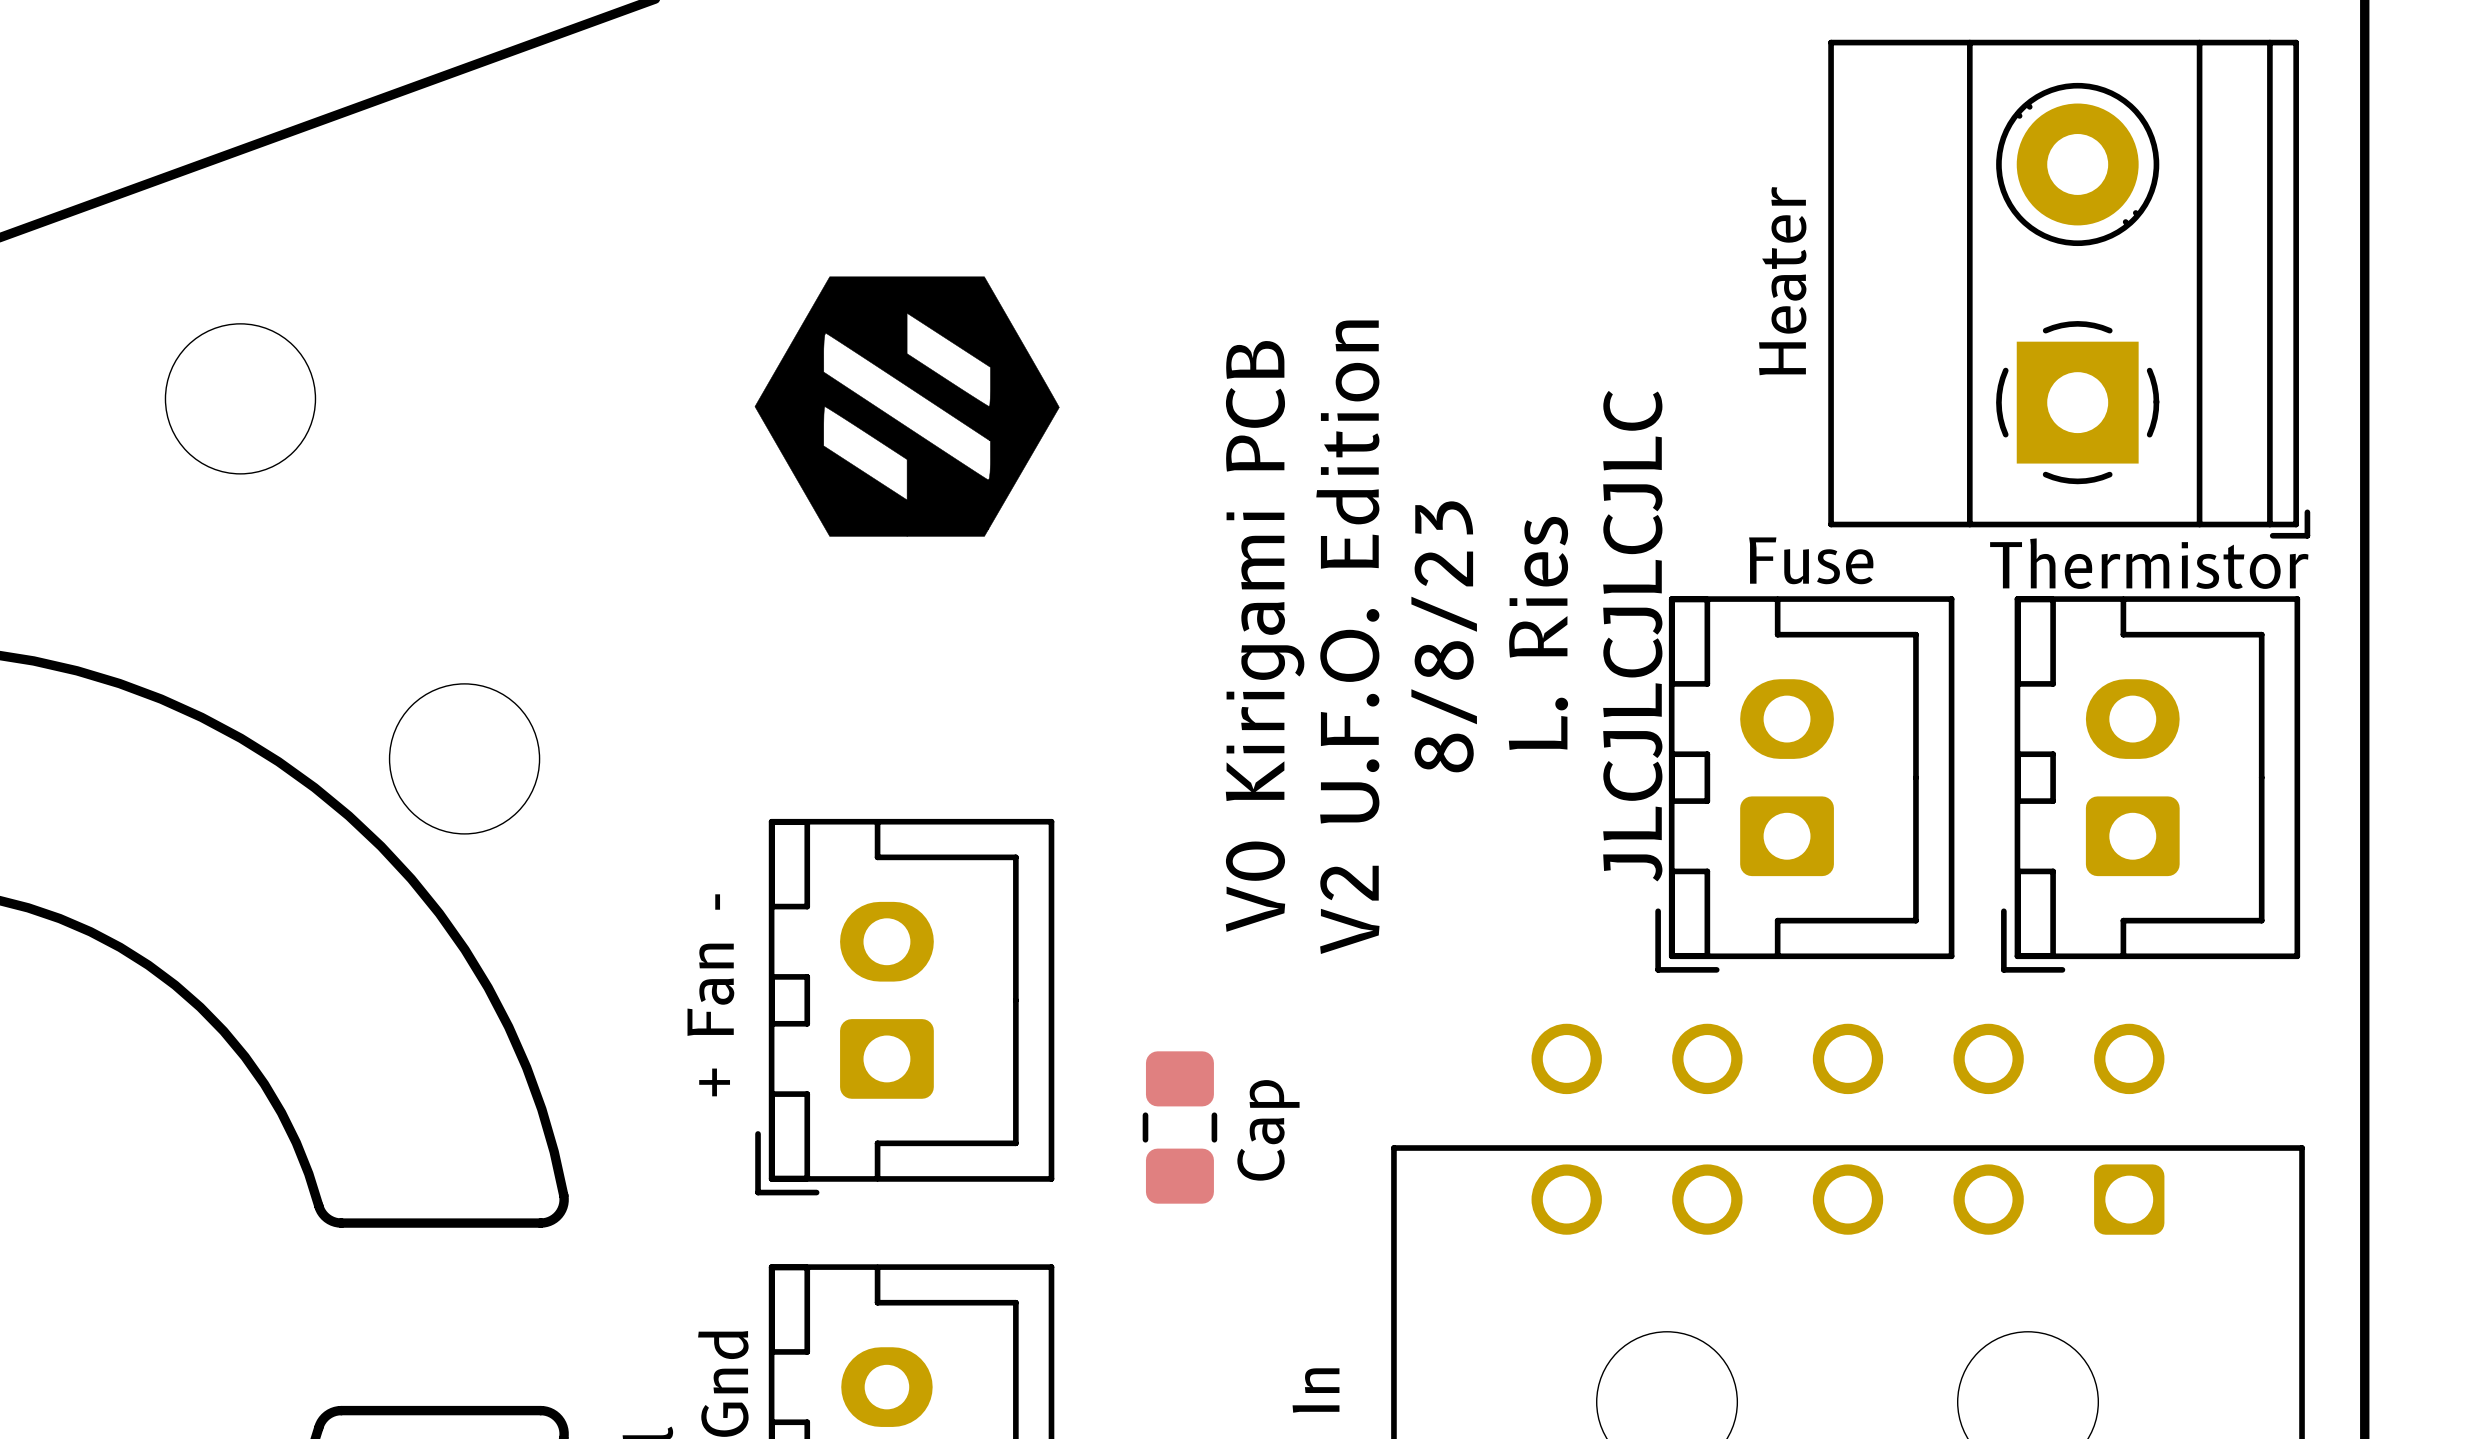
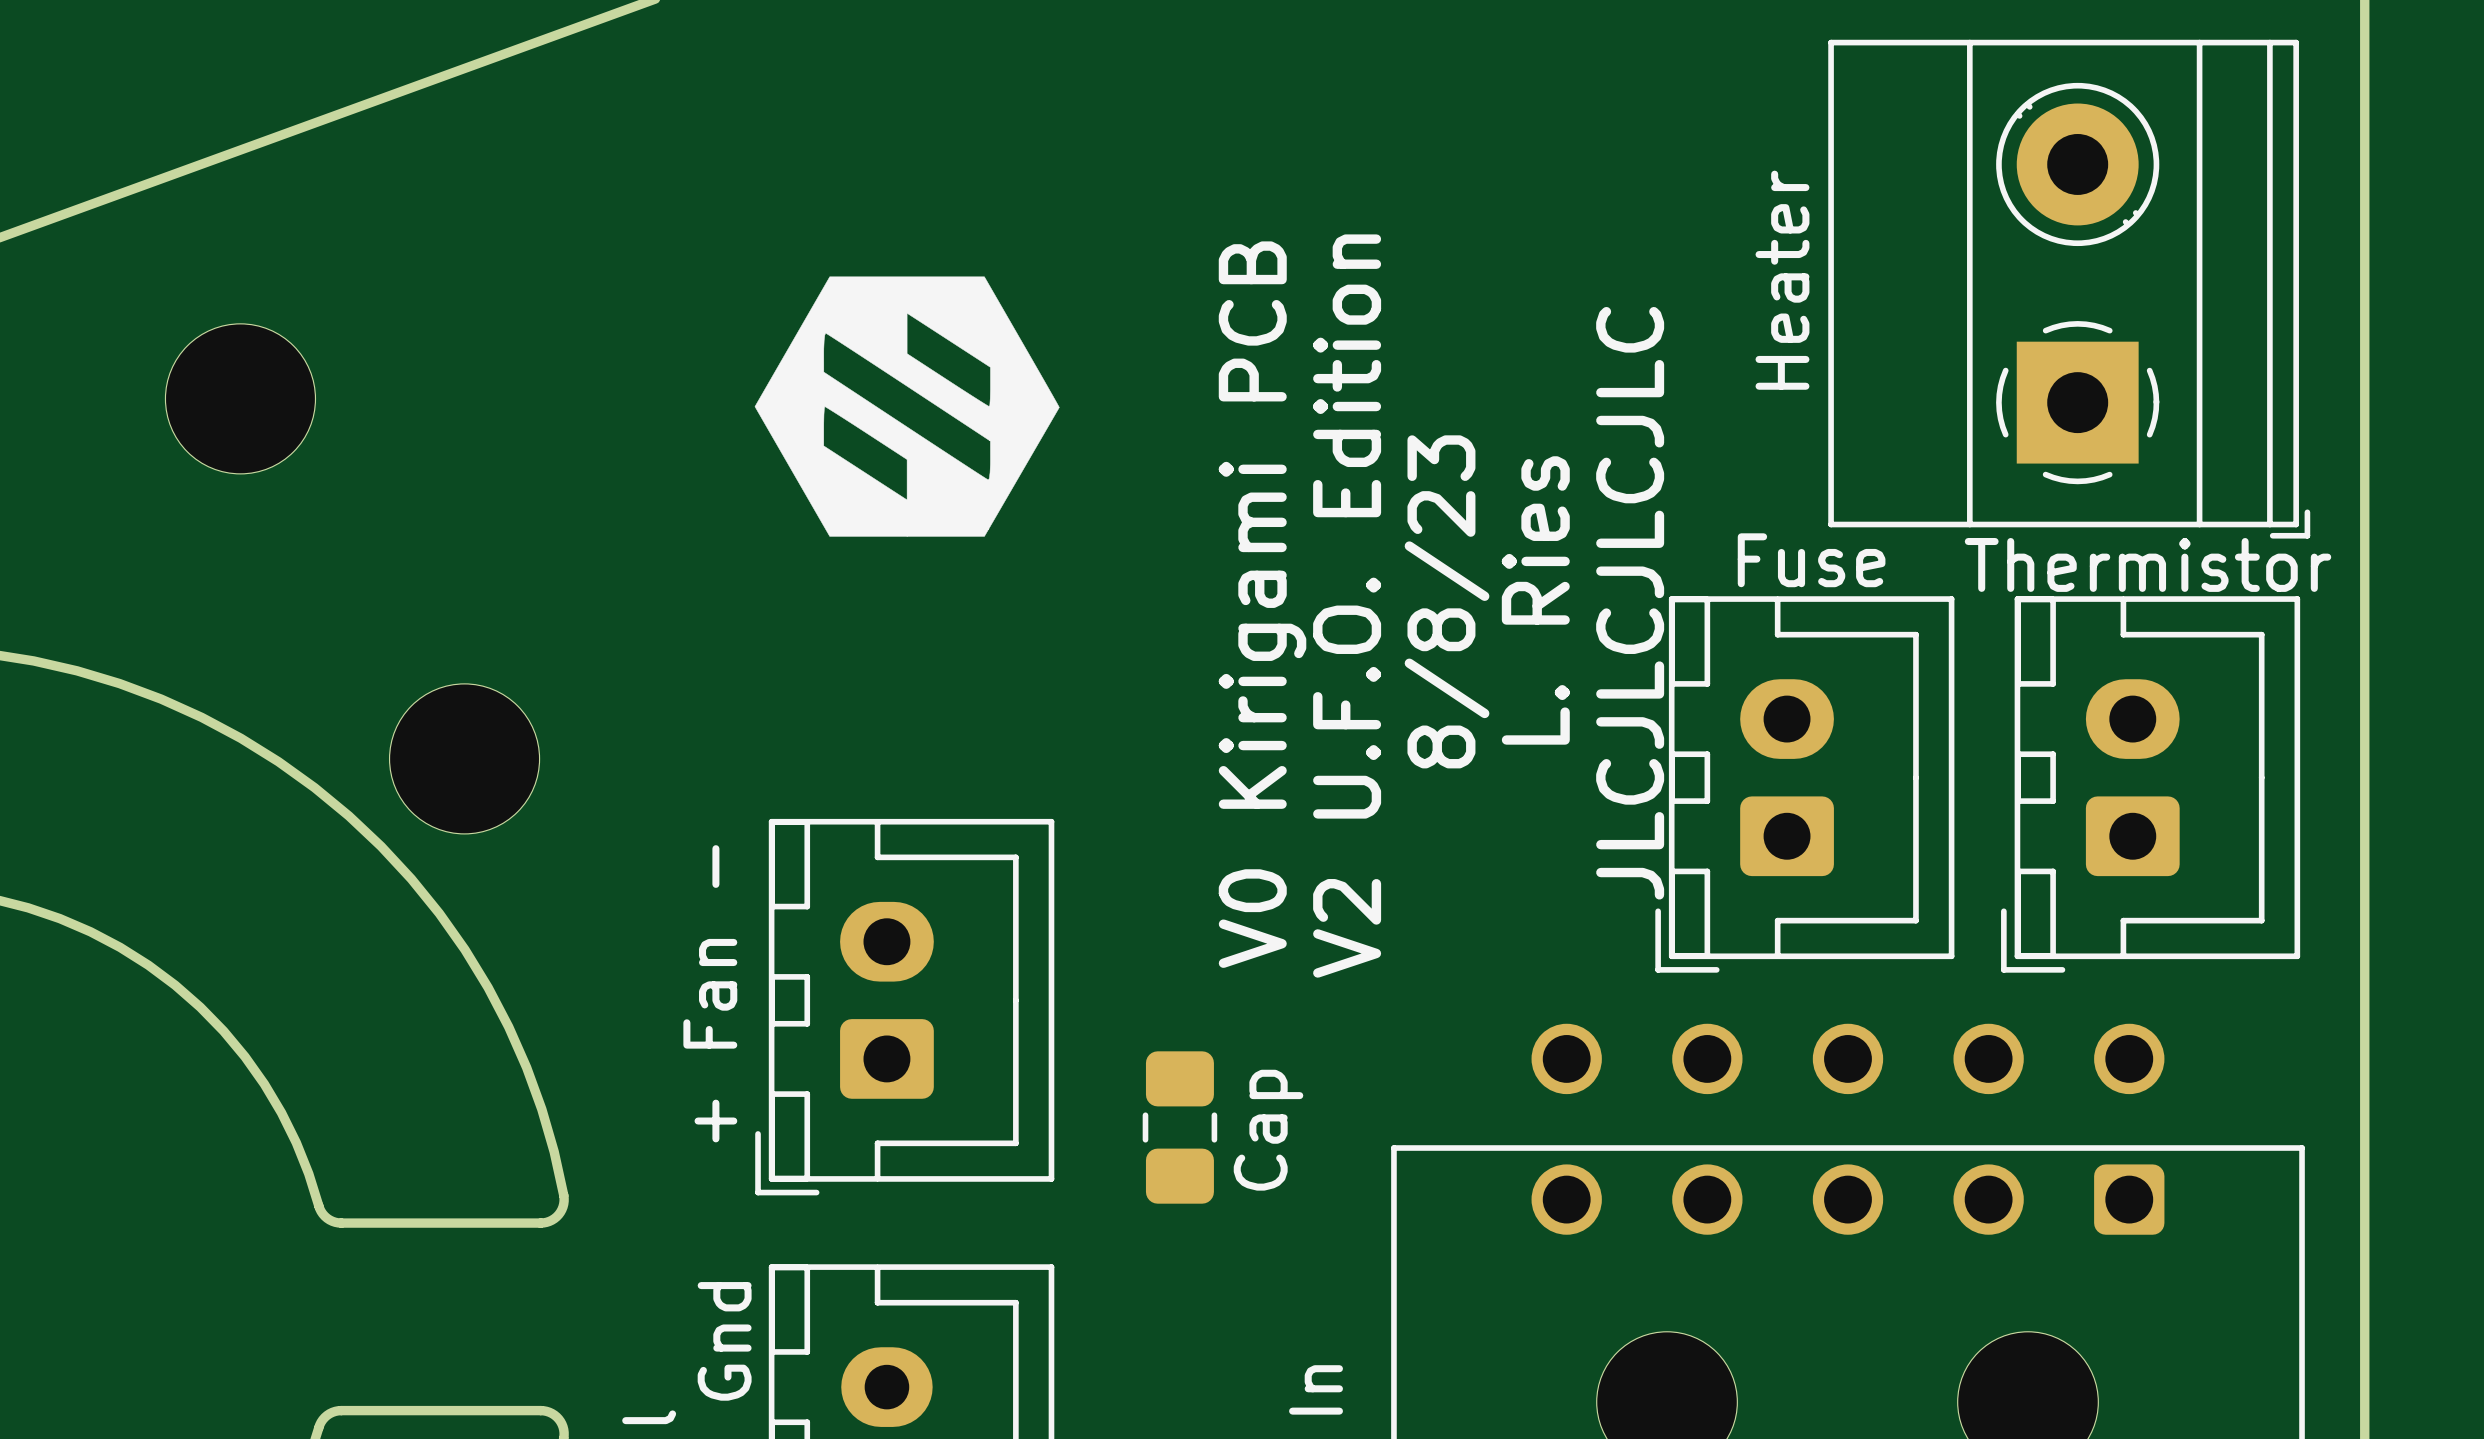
text position: L. Ries (1538, 633) -> L. Ries (1535, 600)
text position: V0 Kirigami PCB (1265, 636) -> V0 Kirigami PCB (1262, 604)
text position: 8/8/23 (1444, 636) -> 8/8/23 (1447, 601)
text position: JLCJLCJLCJLC (1632, 636) -> JLCJLCJLCJLC (1630, 603)
text position: V2 U.F.O. Edition (1347, 637) -> V2 U.F.O. Edition (1347, 606)

